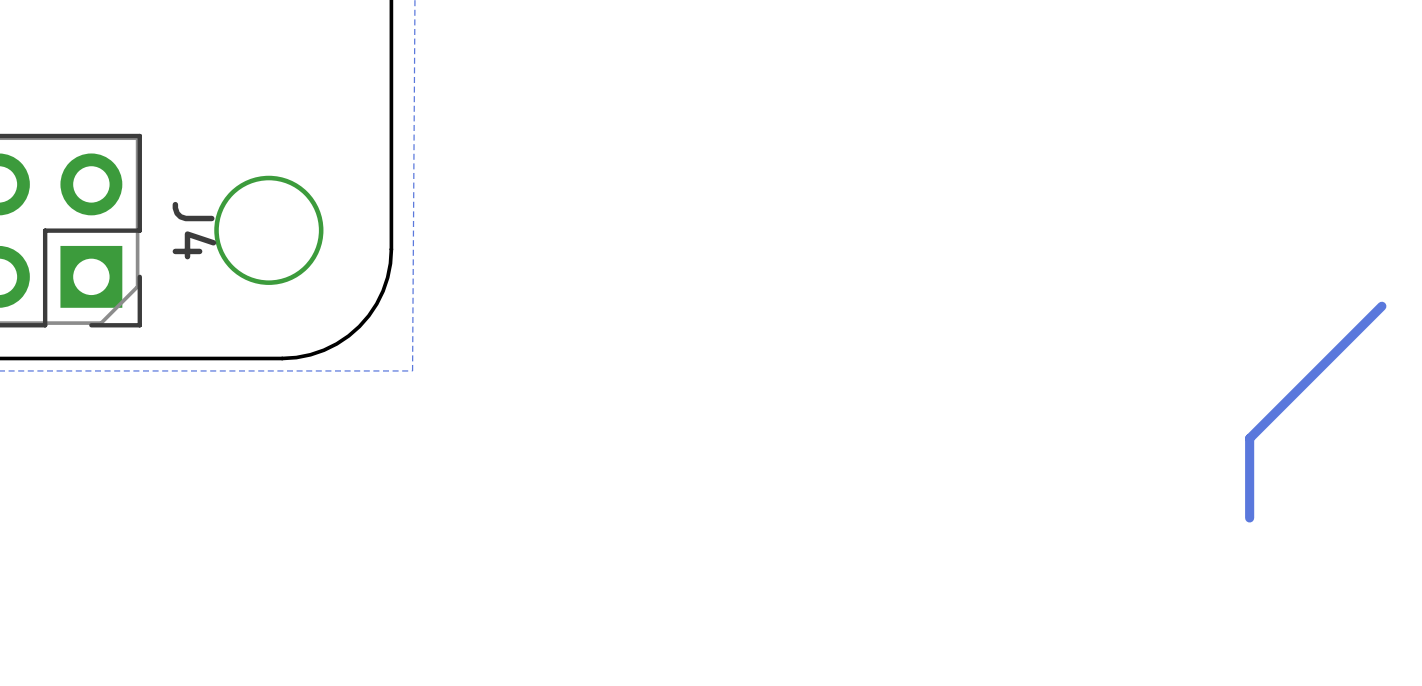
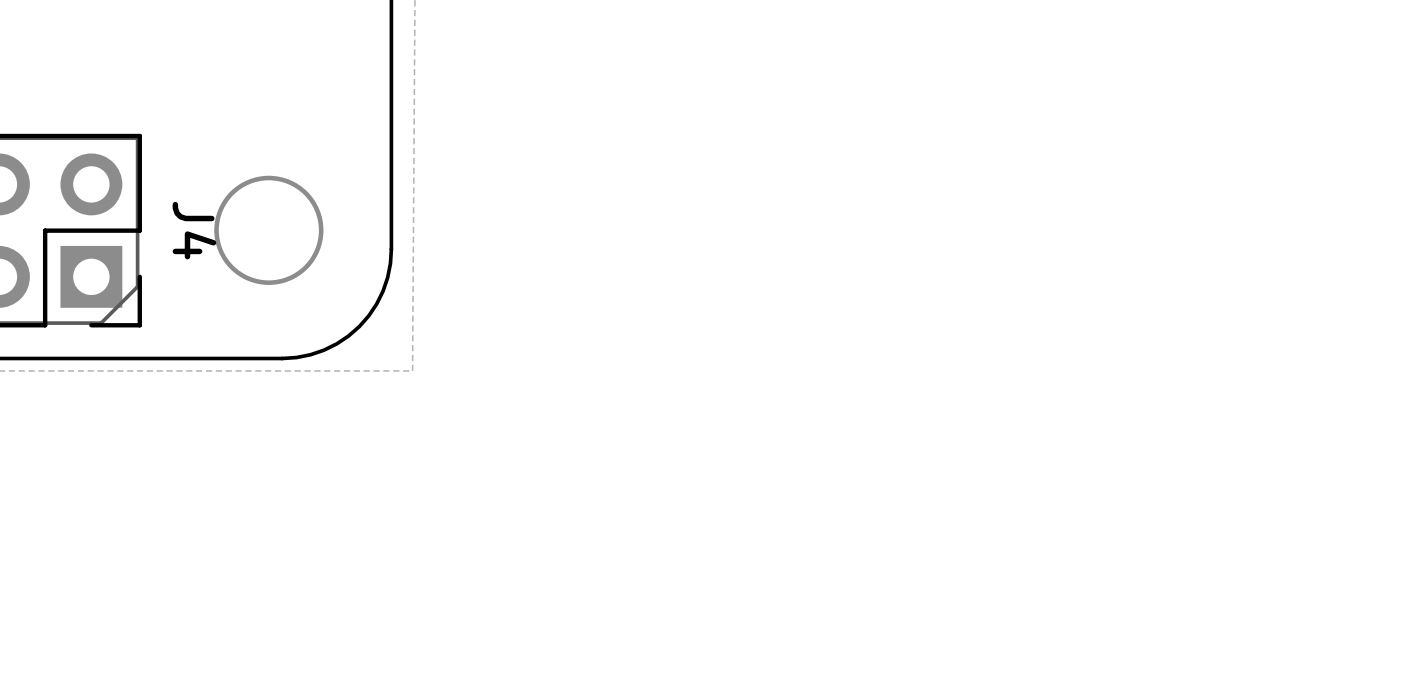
track: (1381, 306) (1249, 438) (1249, 517) -> none

